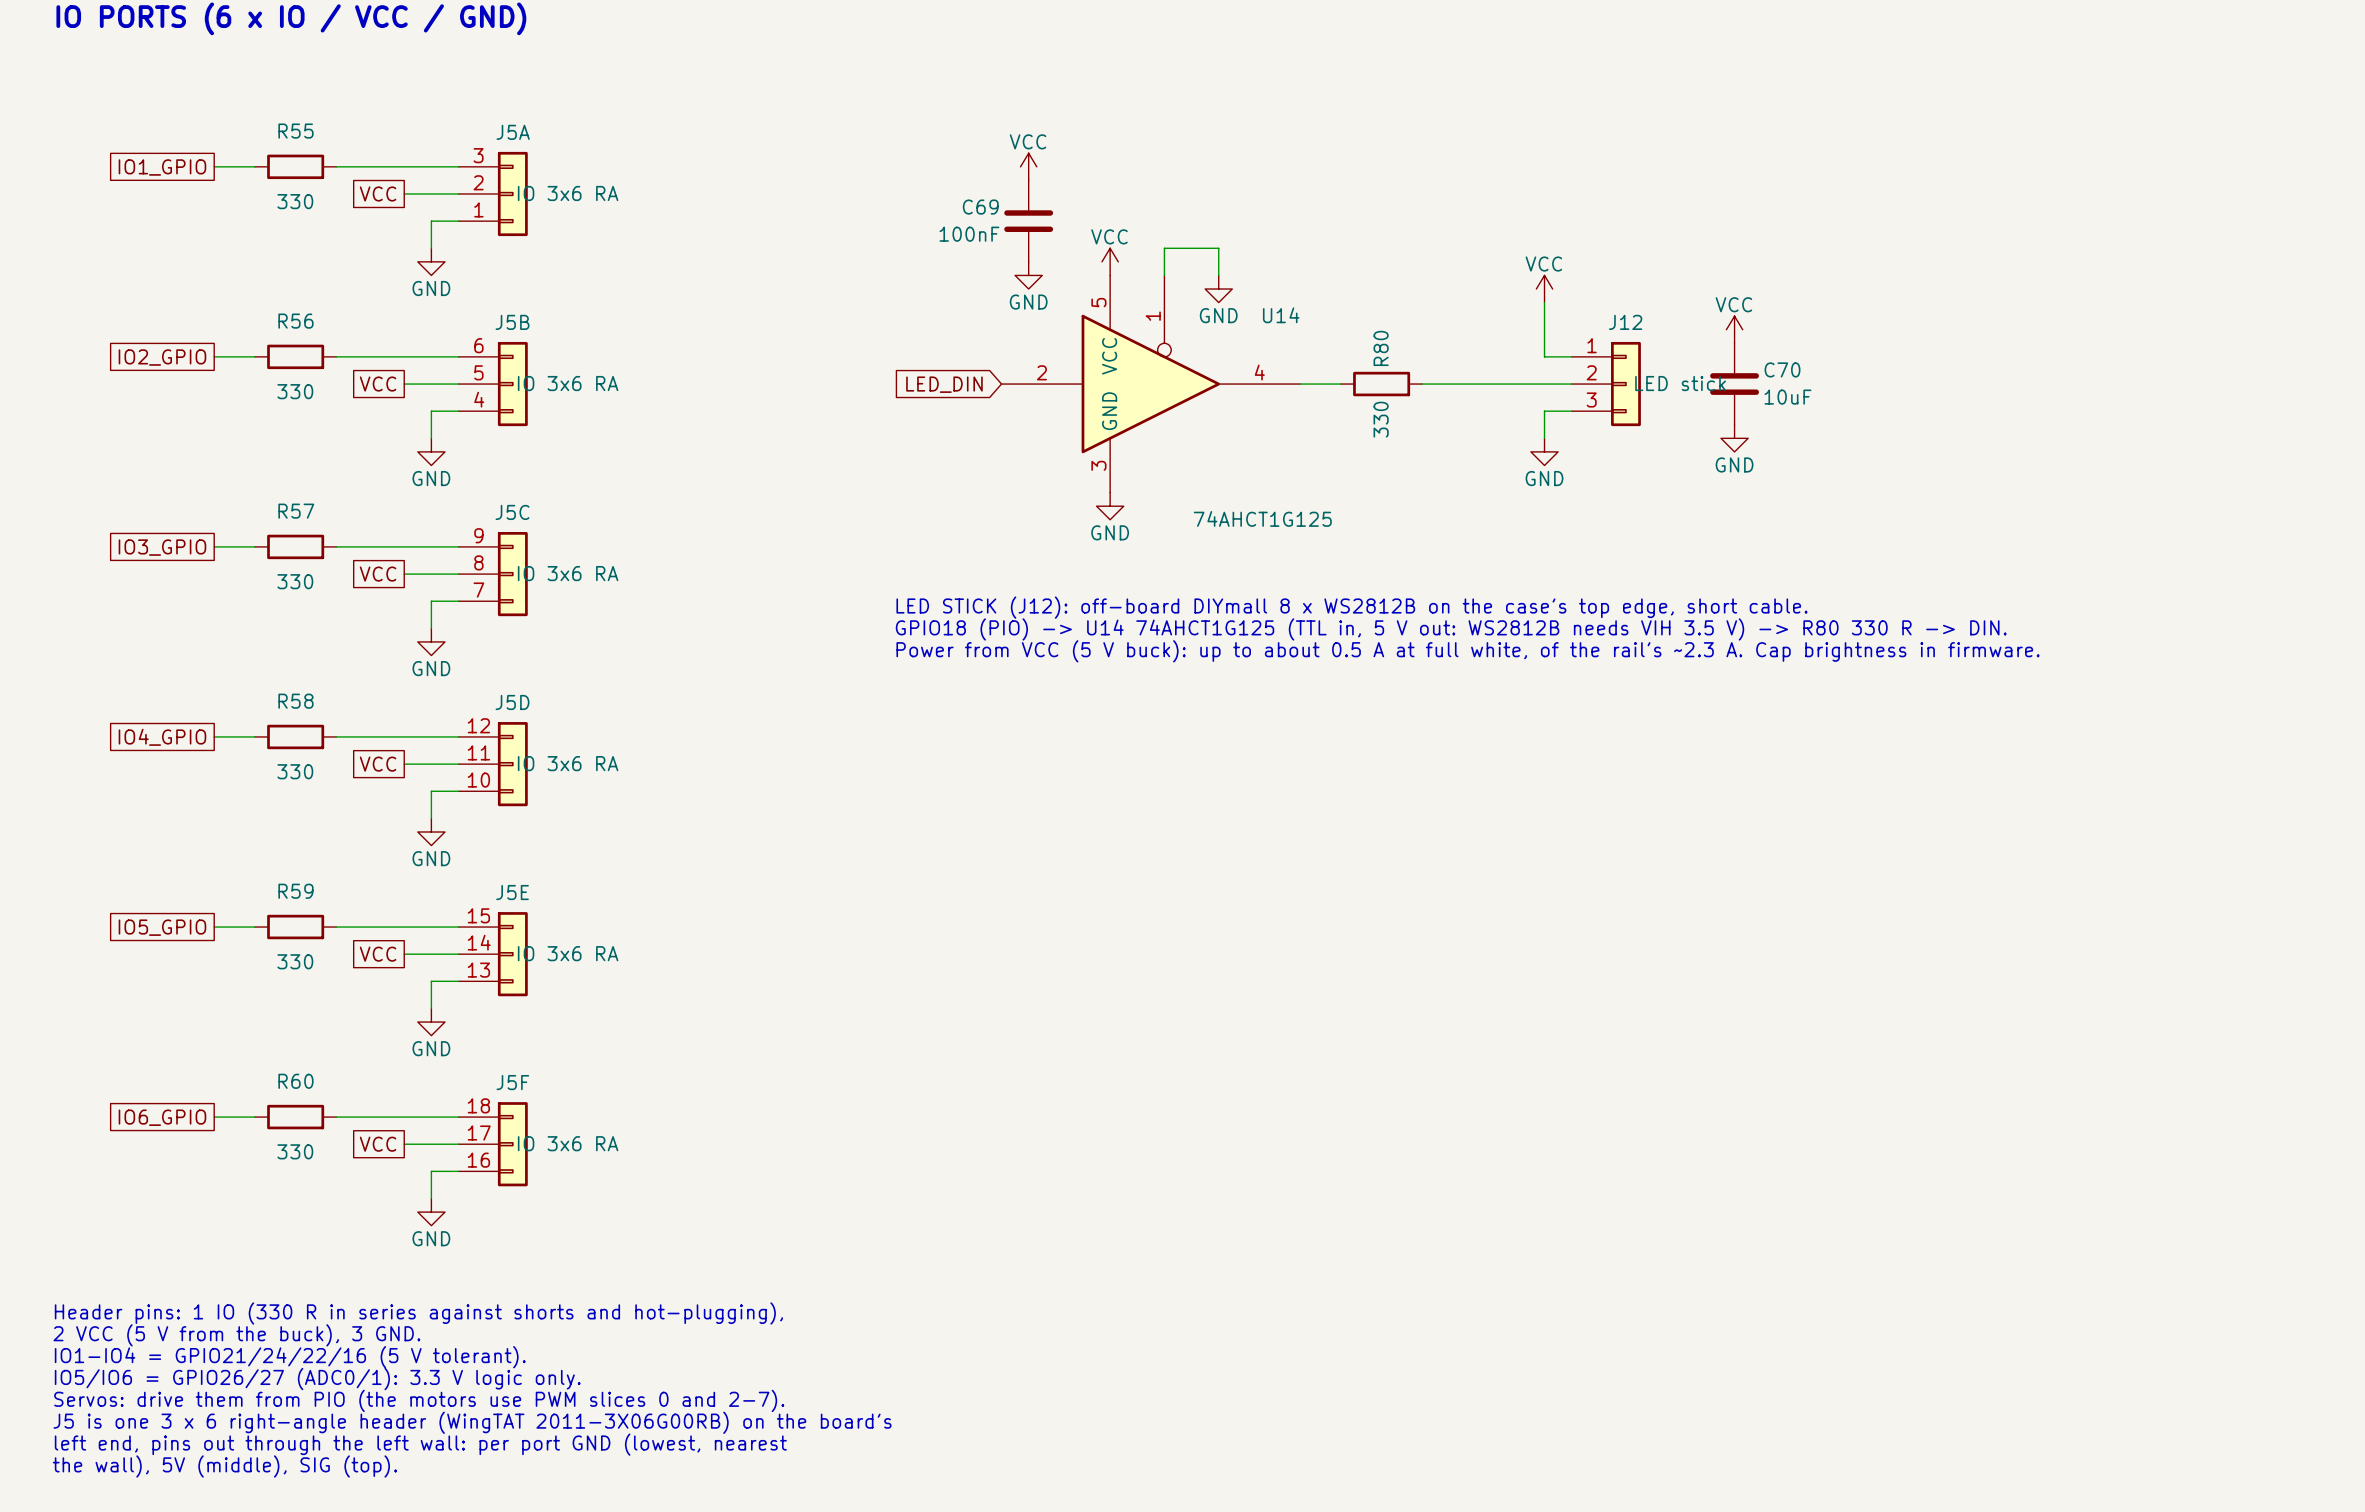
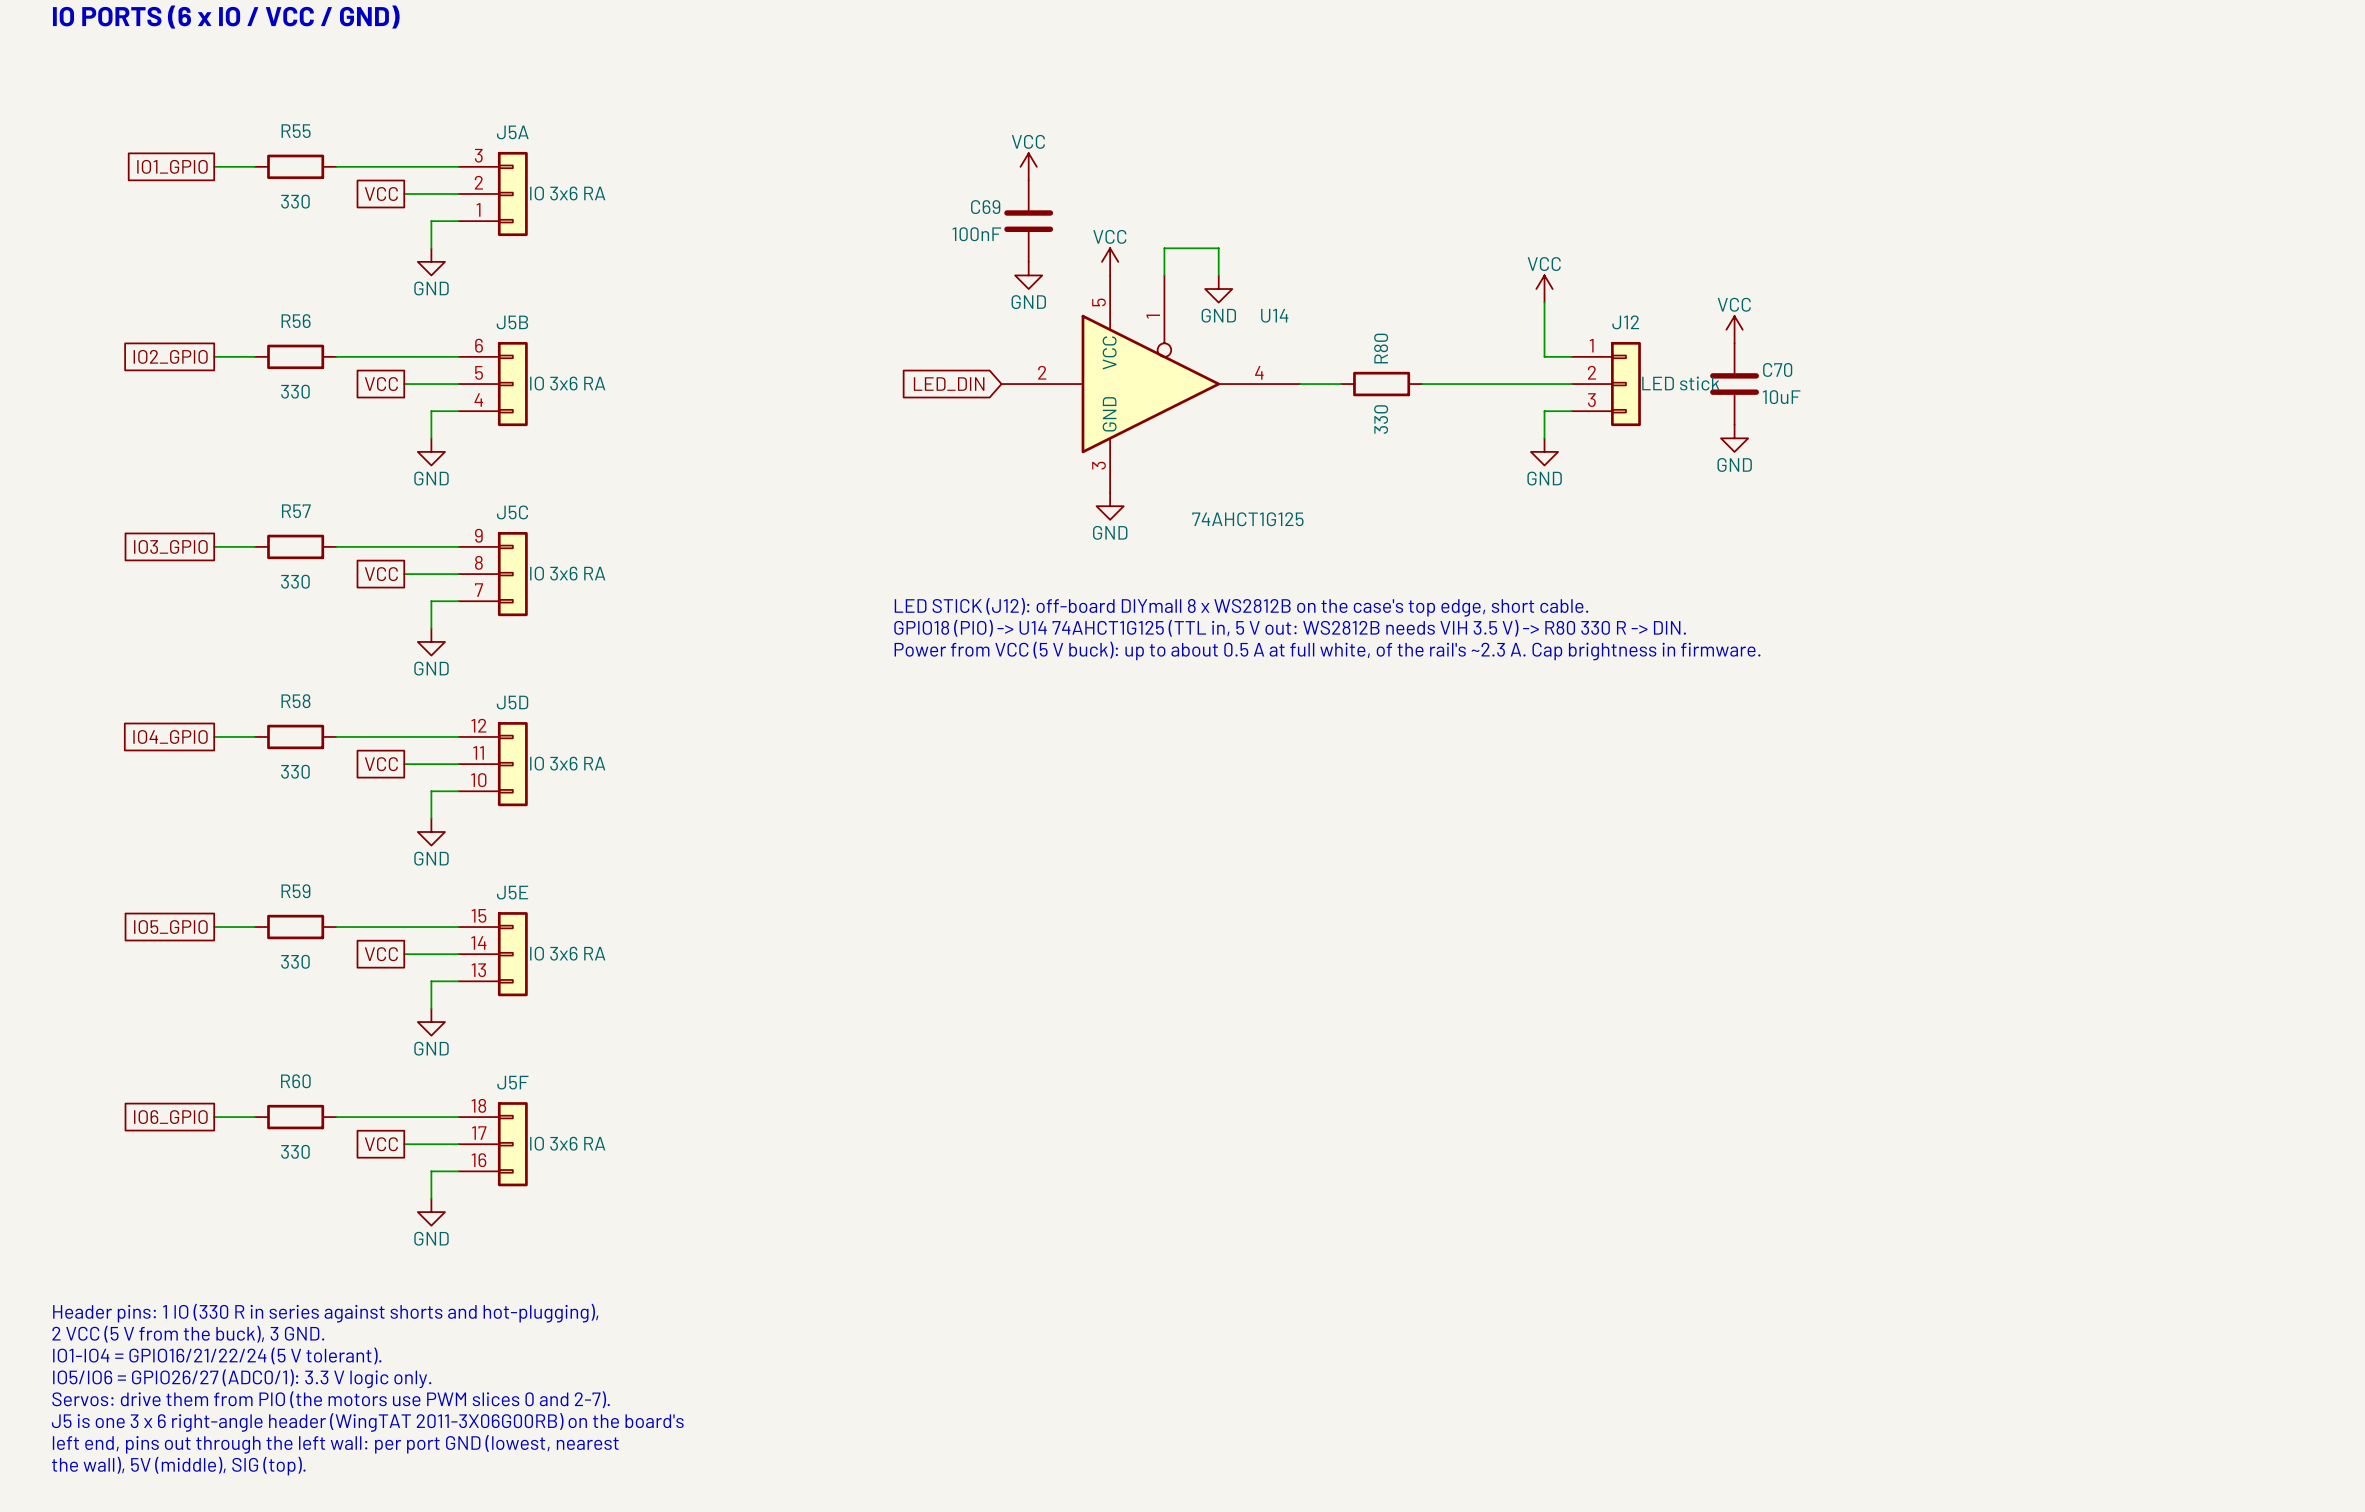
text: IO1-IO4 = GPIO21/24/22/16 (5 V tolerant). (290, 1357) -> IO1-IO4 = GPIO16/21/22/24 (5 V tolerant). (217, 1355)

